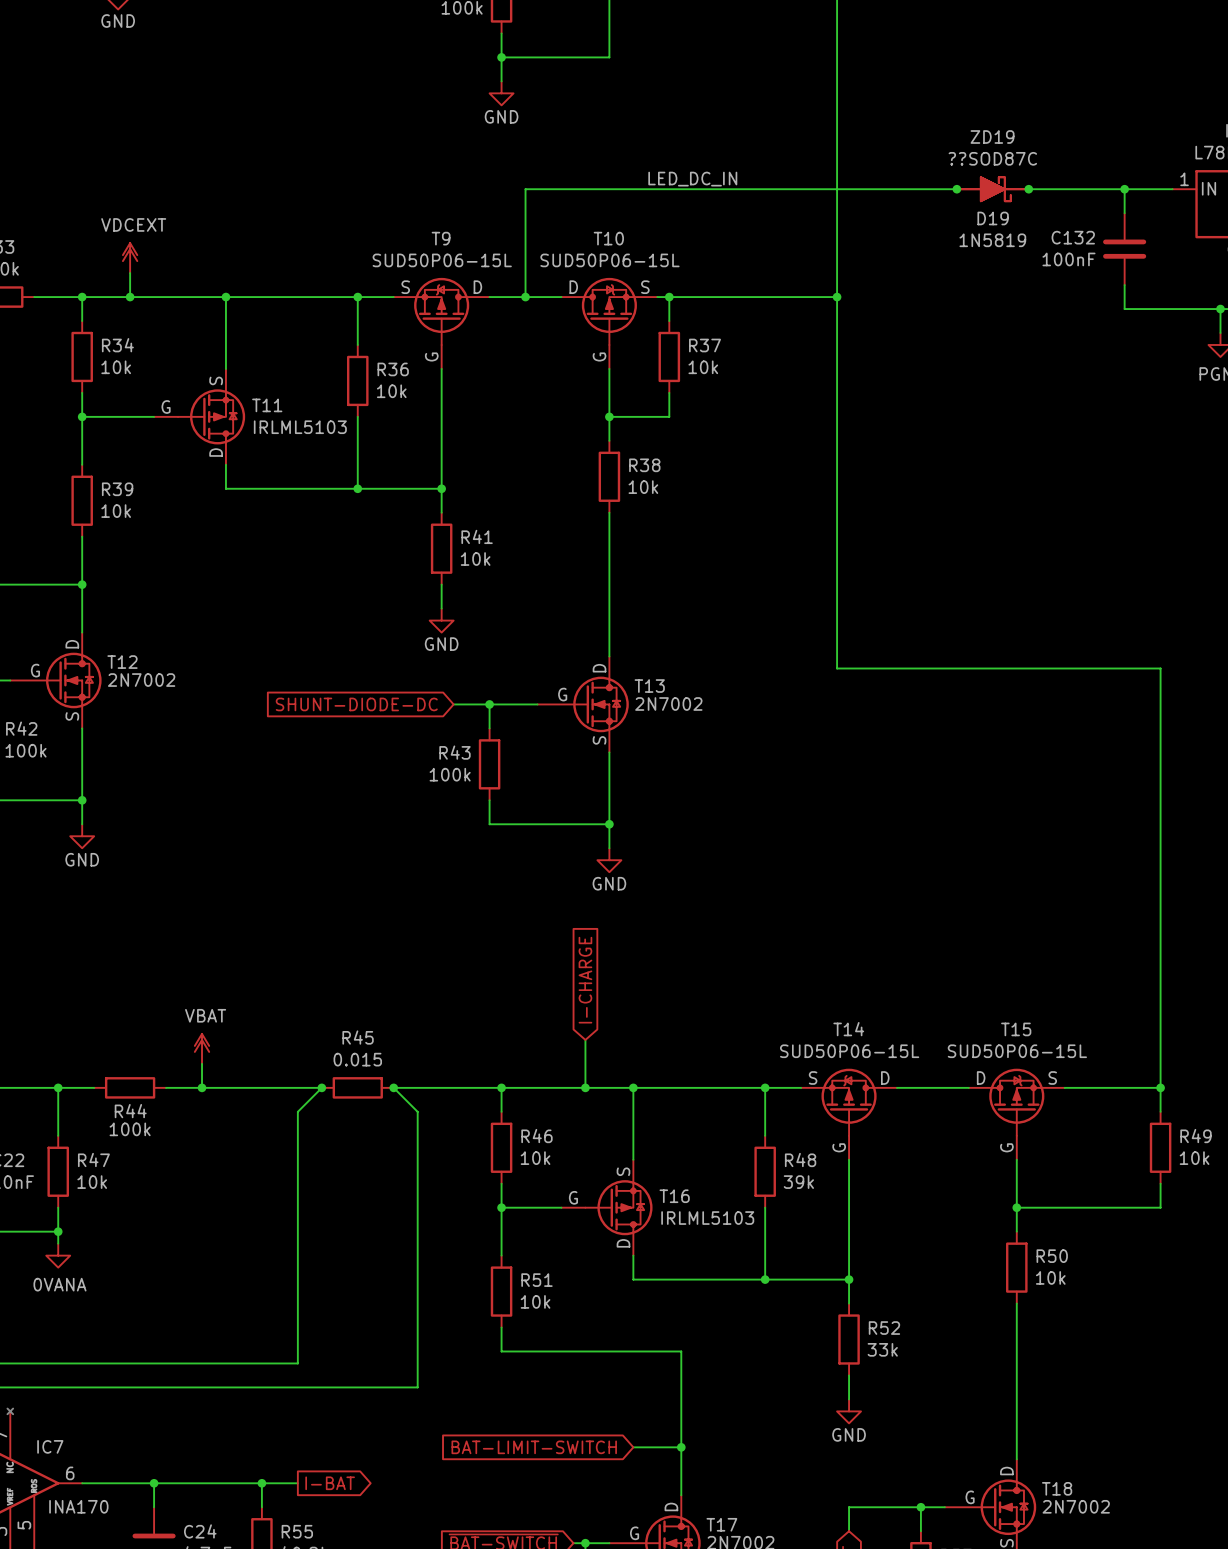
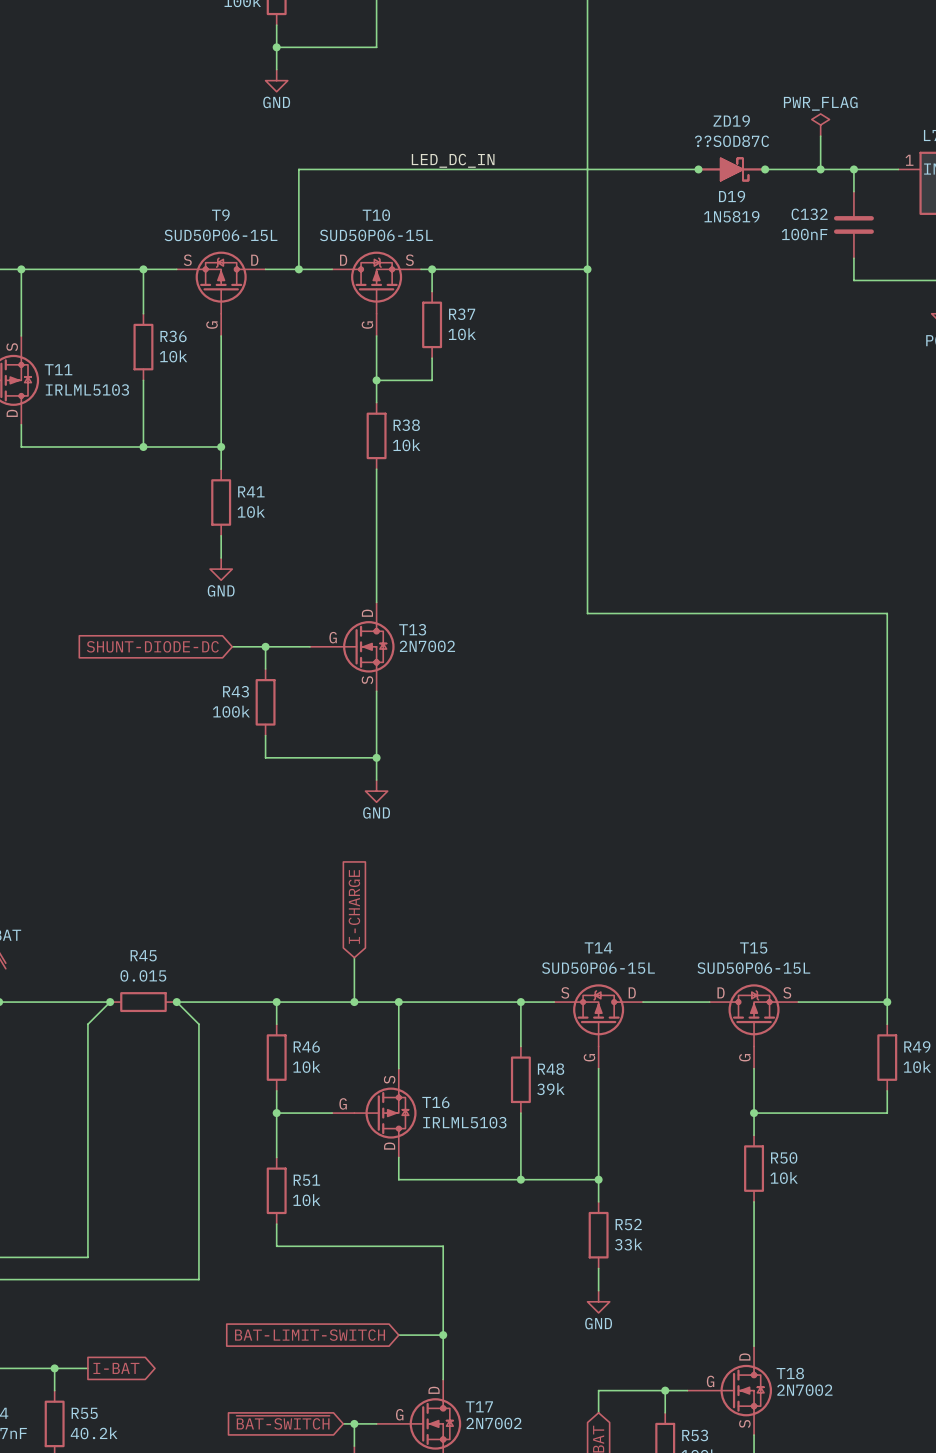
power symbol: none -> PWR_FLAG (820, 125)
wire: none -> (820, 136) (820, 169)
junction: none -> (820, 169)

